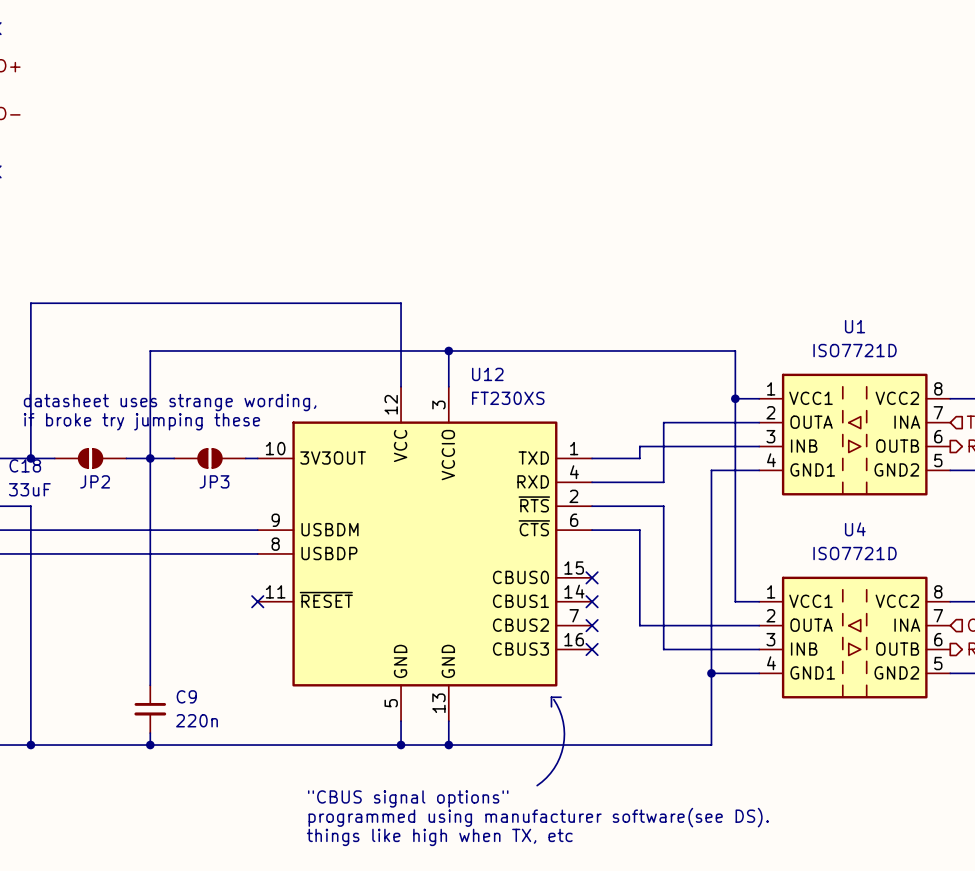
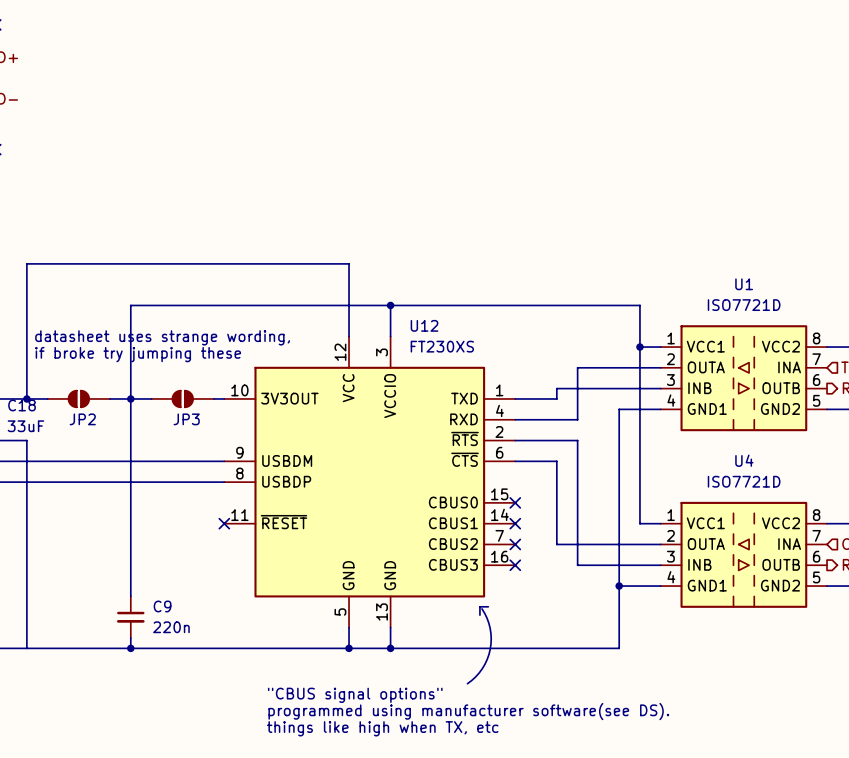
text position: datasheet uses strange wording, (170, 402) -> datasheet uses strange wording, (162, 337)
text position: if broke try jumping these (141, 421) -> if broke try jumping these (138, 354)
junction: (30, 745) -> none

